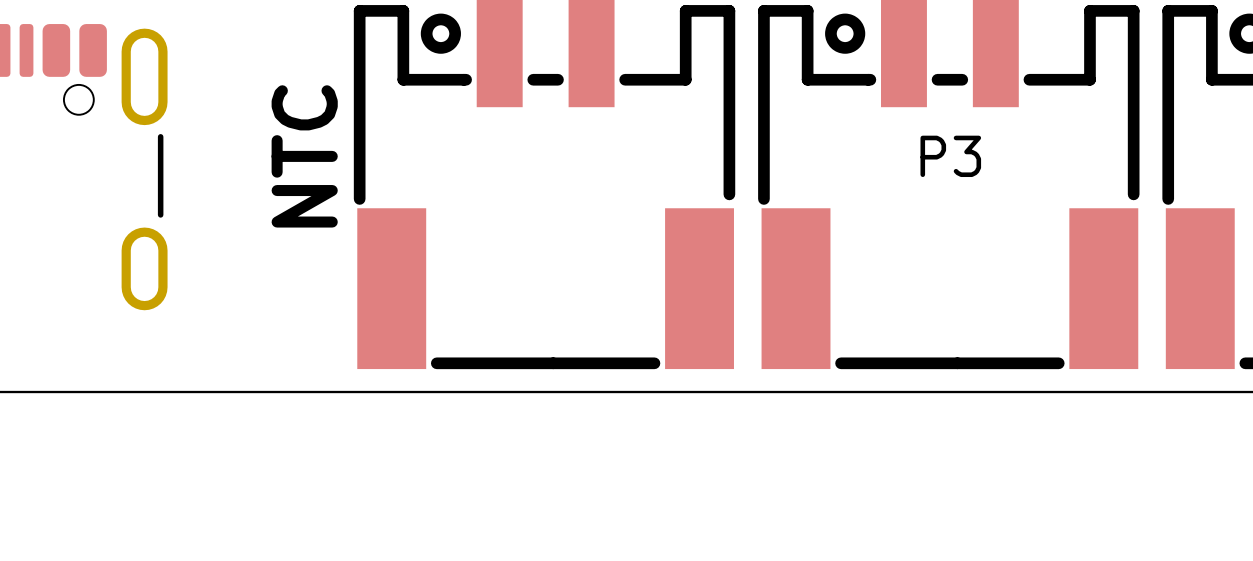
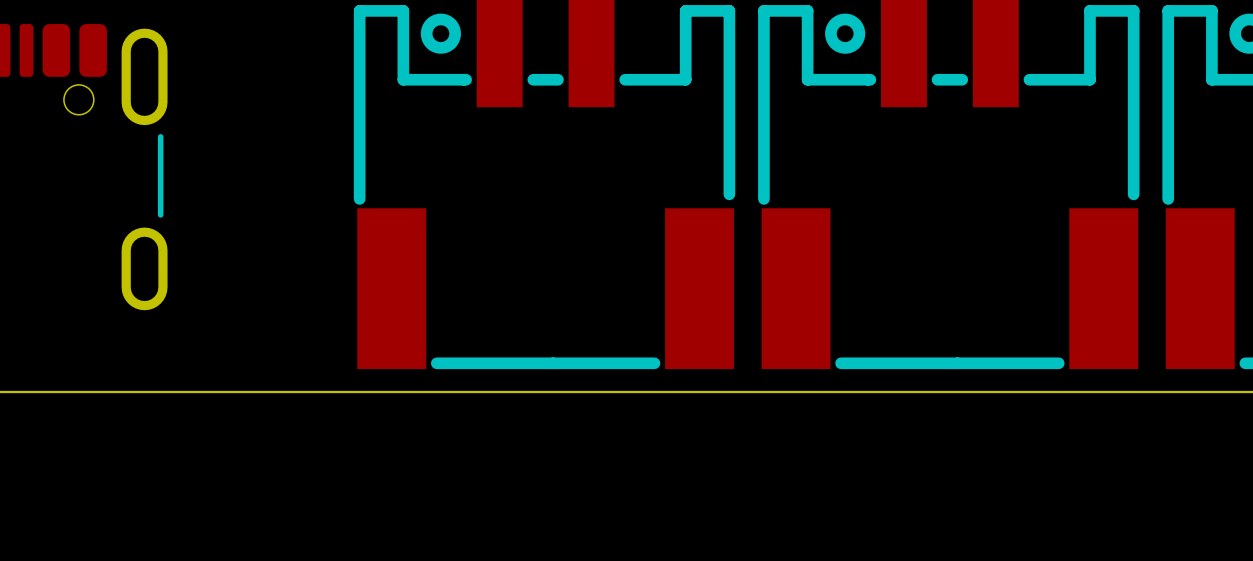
NTC name: NTC (304, 156) -> none
P3 name: P3 (950, 156) -> none

